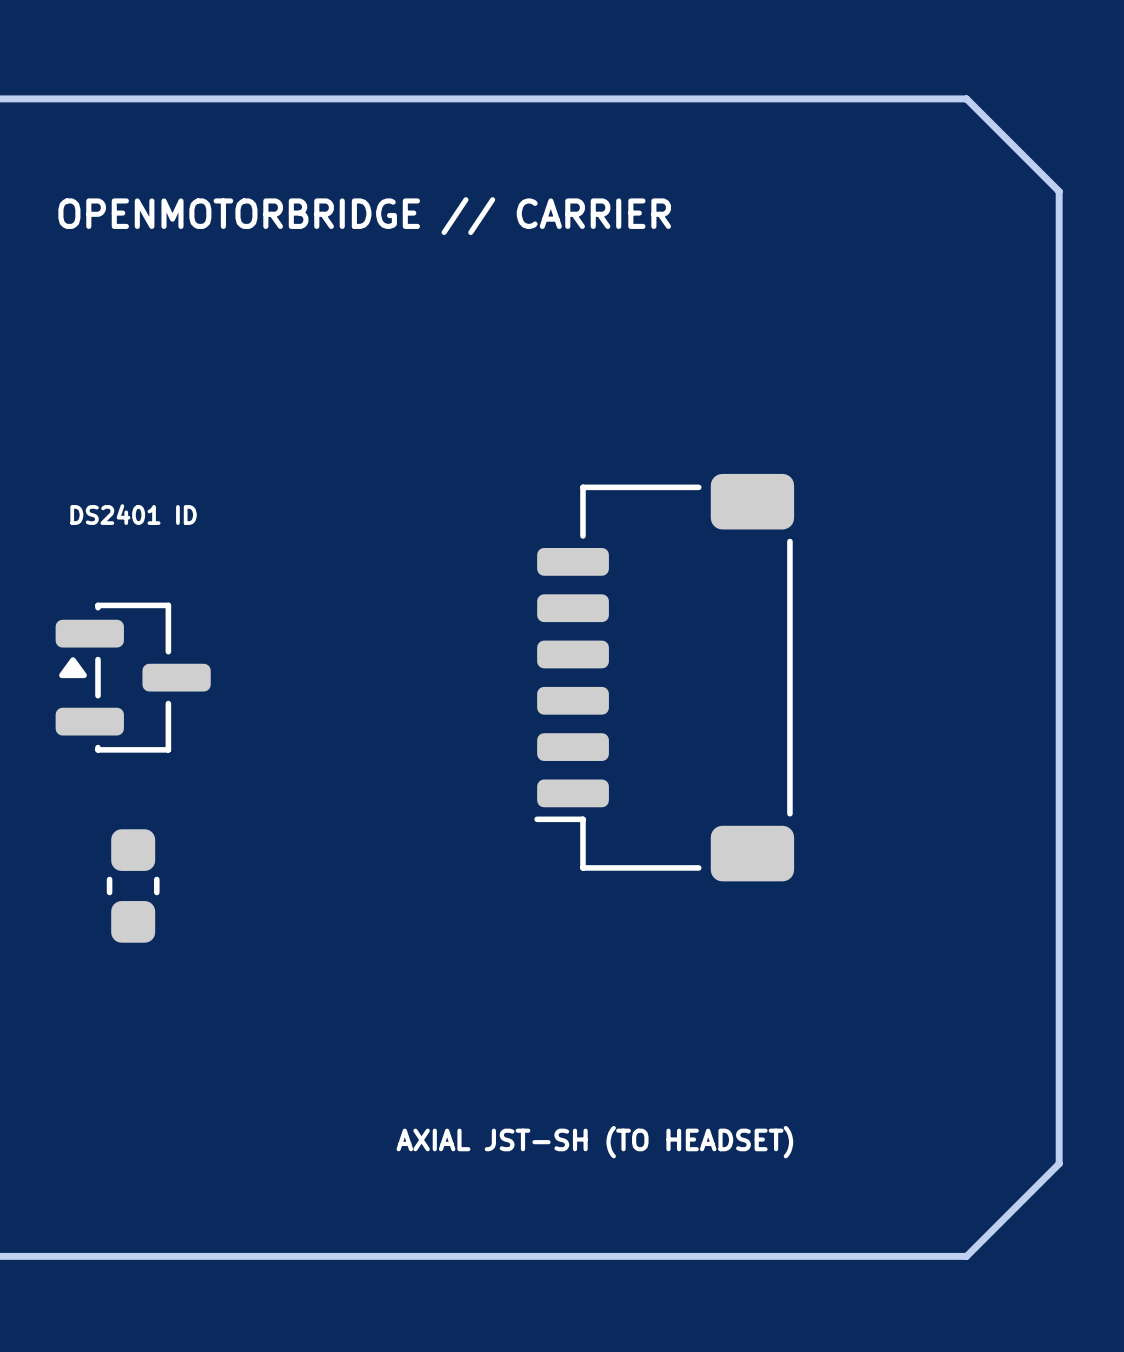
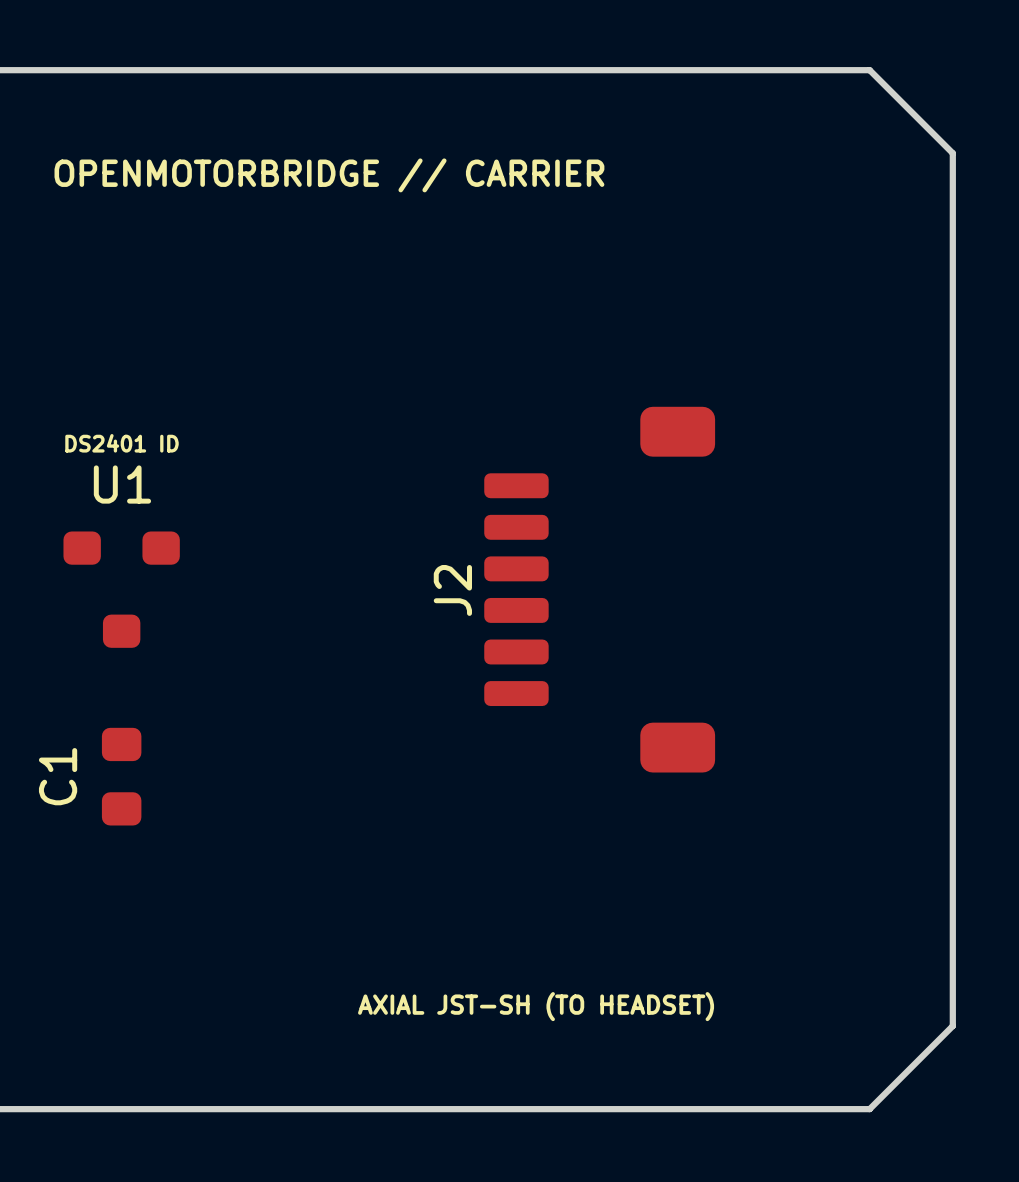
part: (133, 677) -> none
U1: none -> (121, 589)
part: (664, 677) -> none
J2: none -> (599, 589)
part: (133, 885) -> none
C1: none -> (121, 776)

